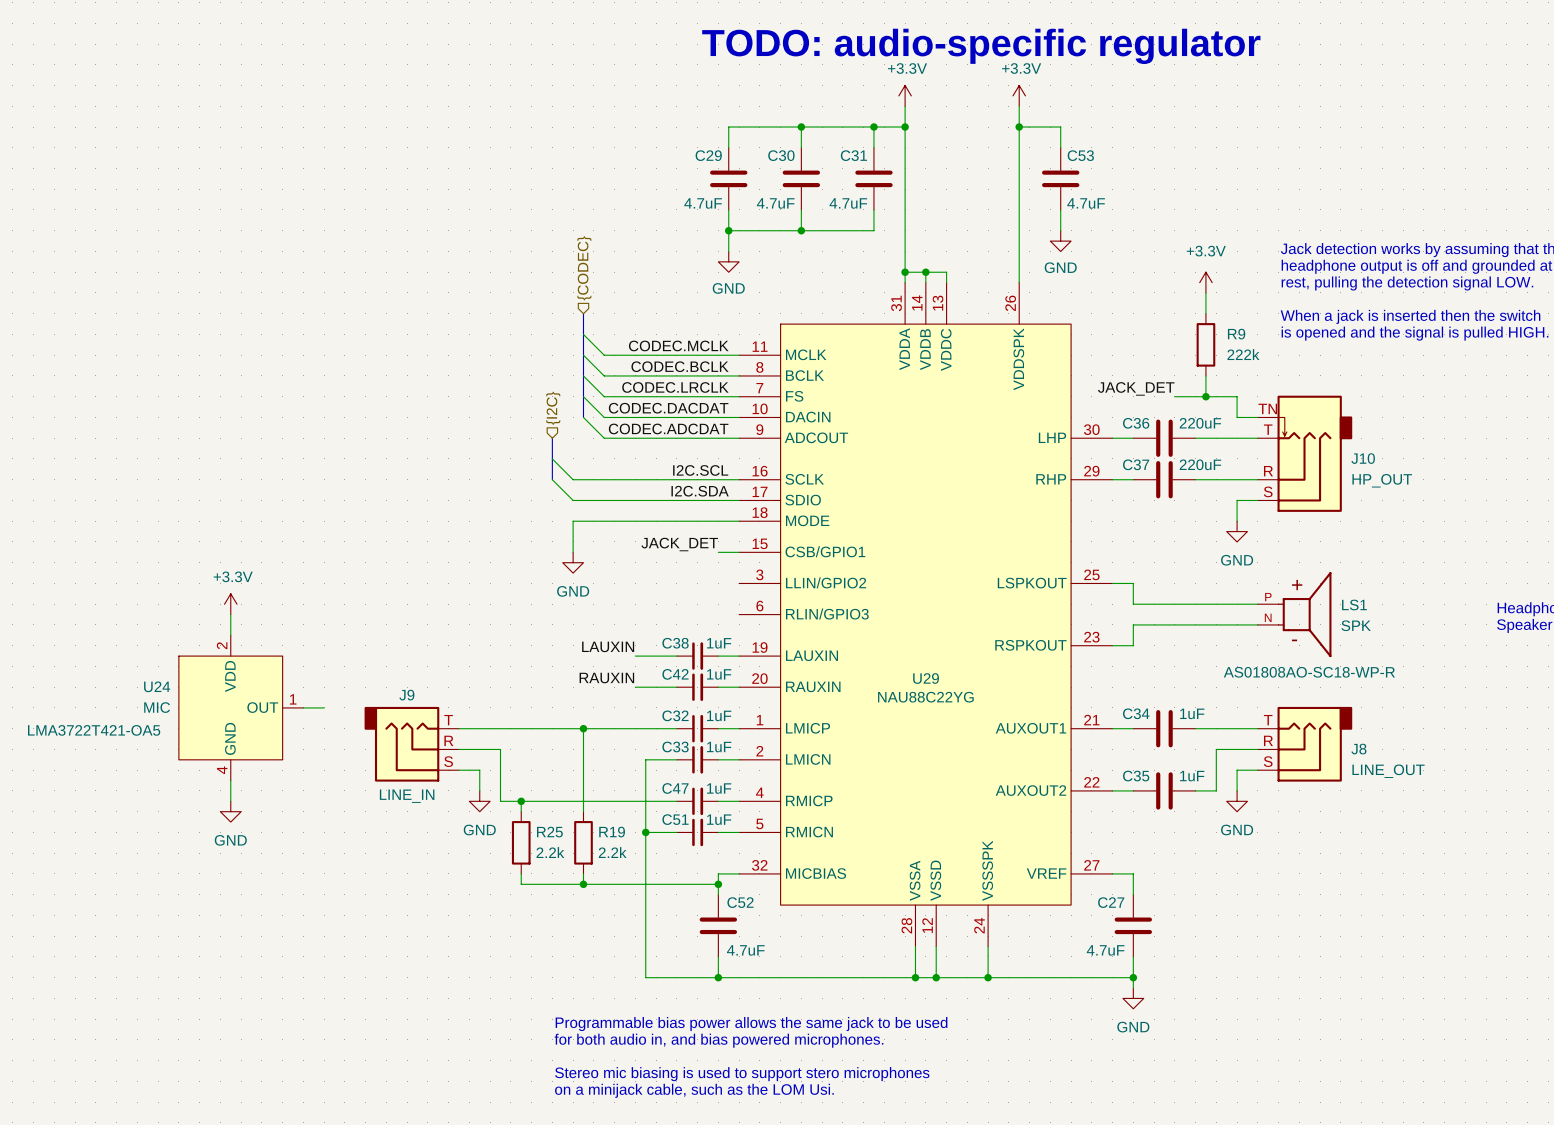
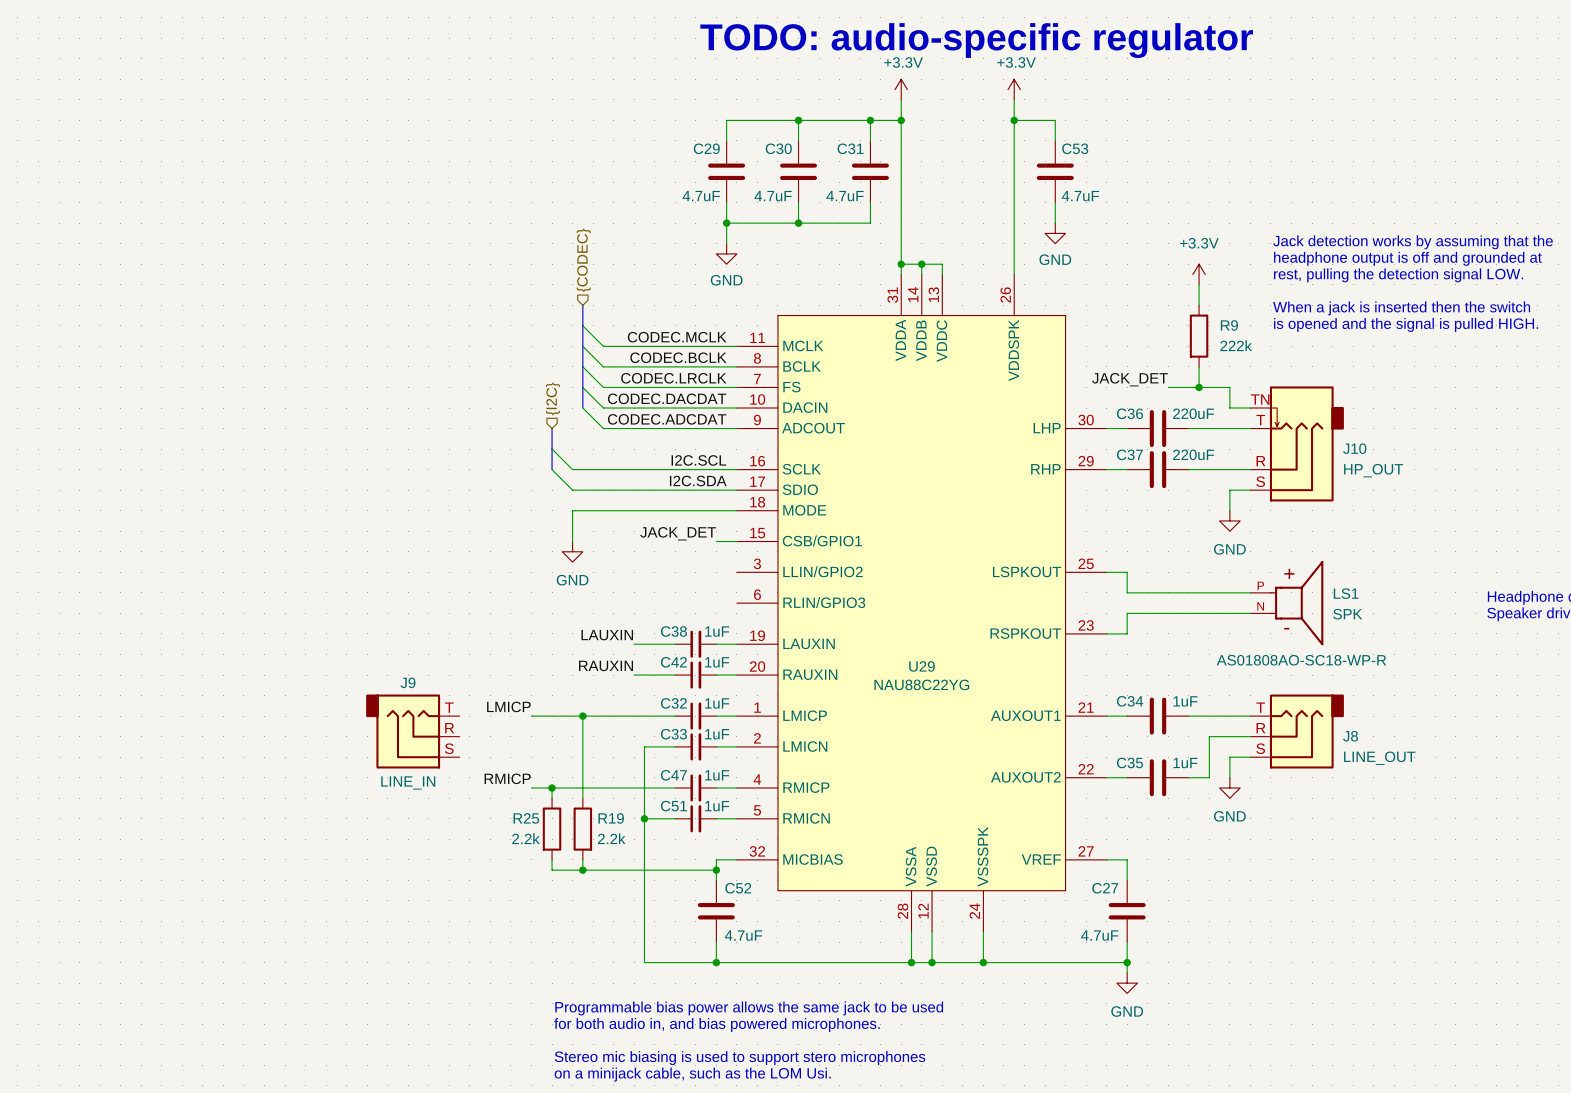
power symbol: +3.3V (230, 604) -> none
wire: (230, 614) (230, 635) -> none
U24: MIC (241, 707) -> none
wire: (303, 707) (324, 707) -> none
label: none -> LMICP (508, 706)
wire: (459, 728) (531, 728) -> none
wire: (459, 749) (500, 749) (500, 801) (531, 801) -> none
wire: (459, 770) (479, 770) (479, 790) -> none
wire: (230, 780) (230, 801) -> none
label: none -> RMICP (507, 778)
power symbol: GND (479, 801) -> none
wire: (521, 801) (521, 811) -> (552, 788) (552, 798)
junction position: (521, 801) -> (552, 788)
power symbol: GND (230, 811) -> none
R25 name position: R25 (549, 832) -> R25 (526, 818)
R25 position: (521, 842) -> (552, 829)
R25 value position: 2.2k (550, 852) -> 2.2k (525, 838)
wire: (521, 873) (521, 884) (552, 884) -> (552, 859) (552, 870)

